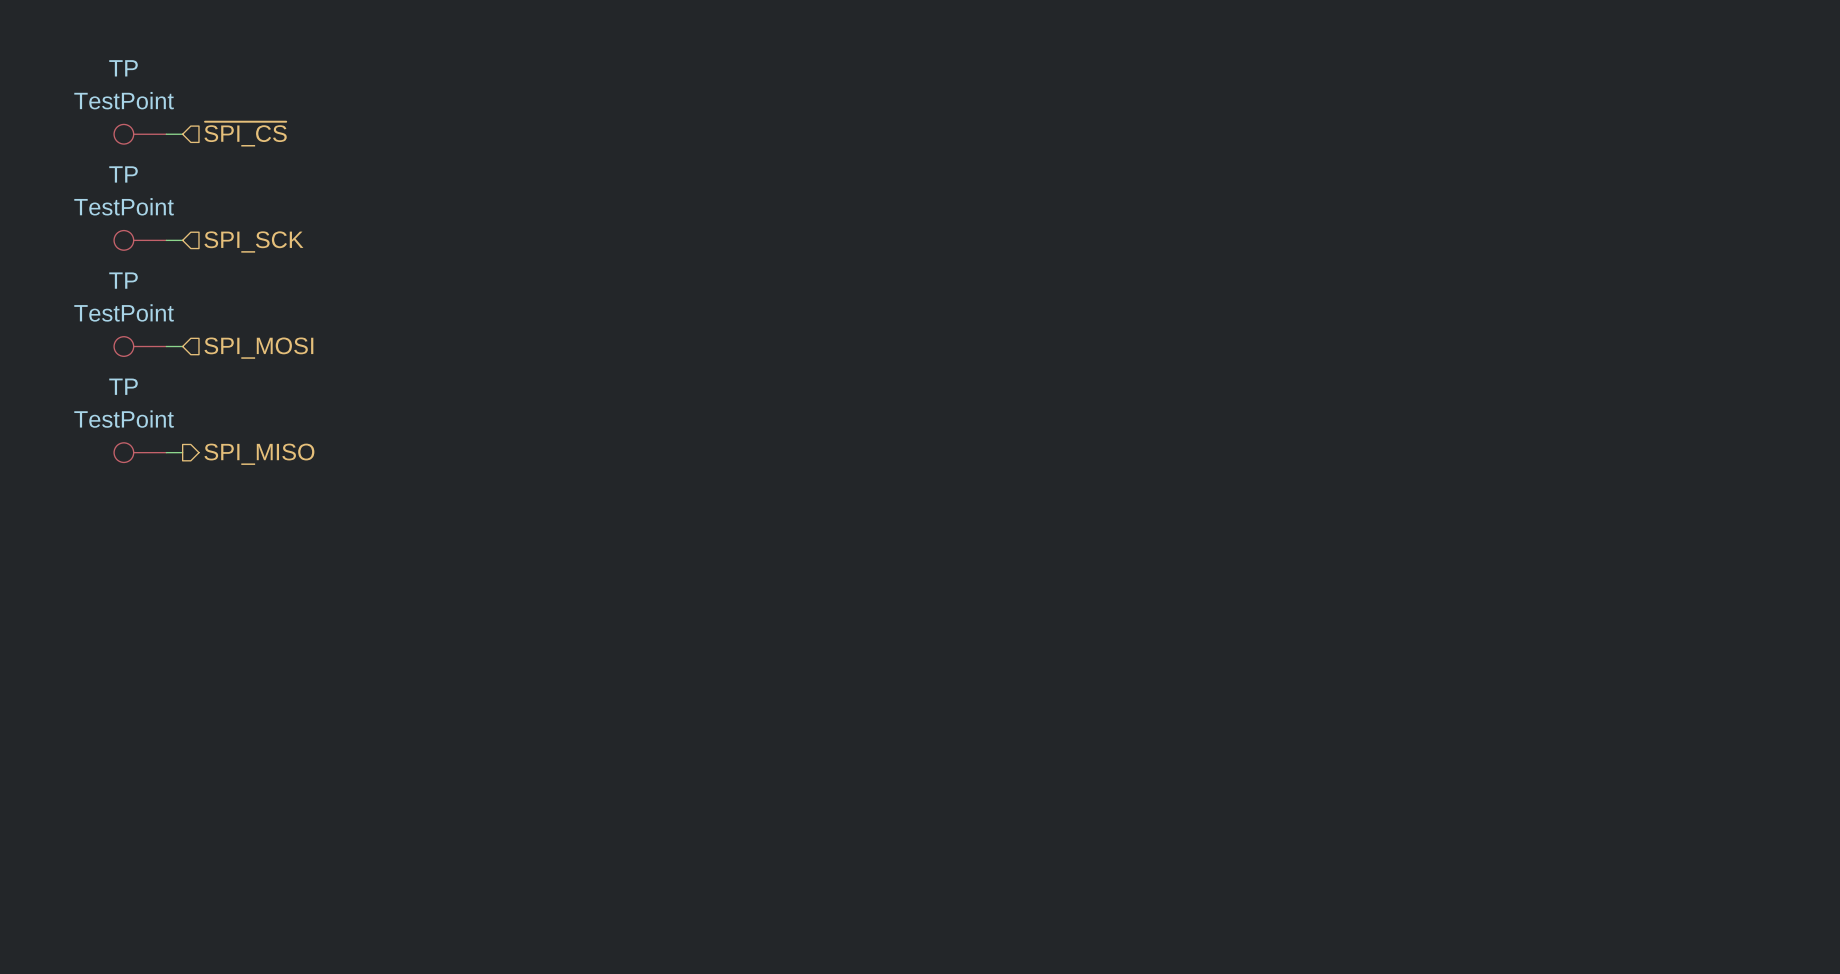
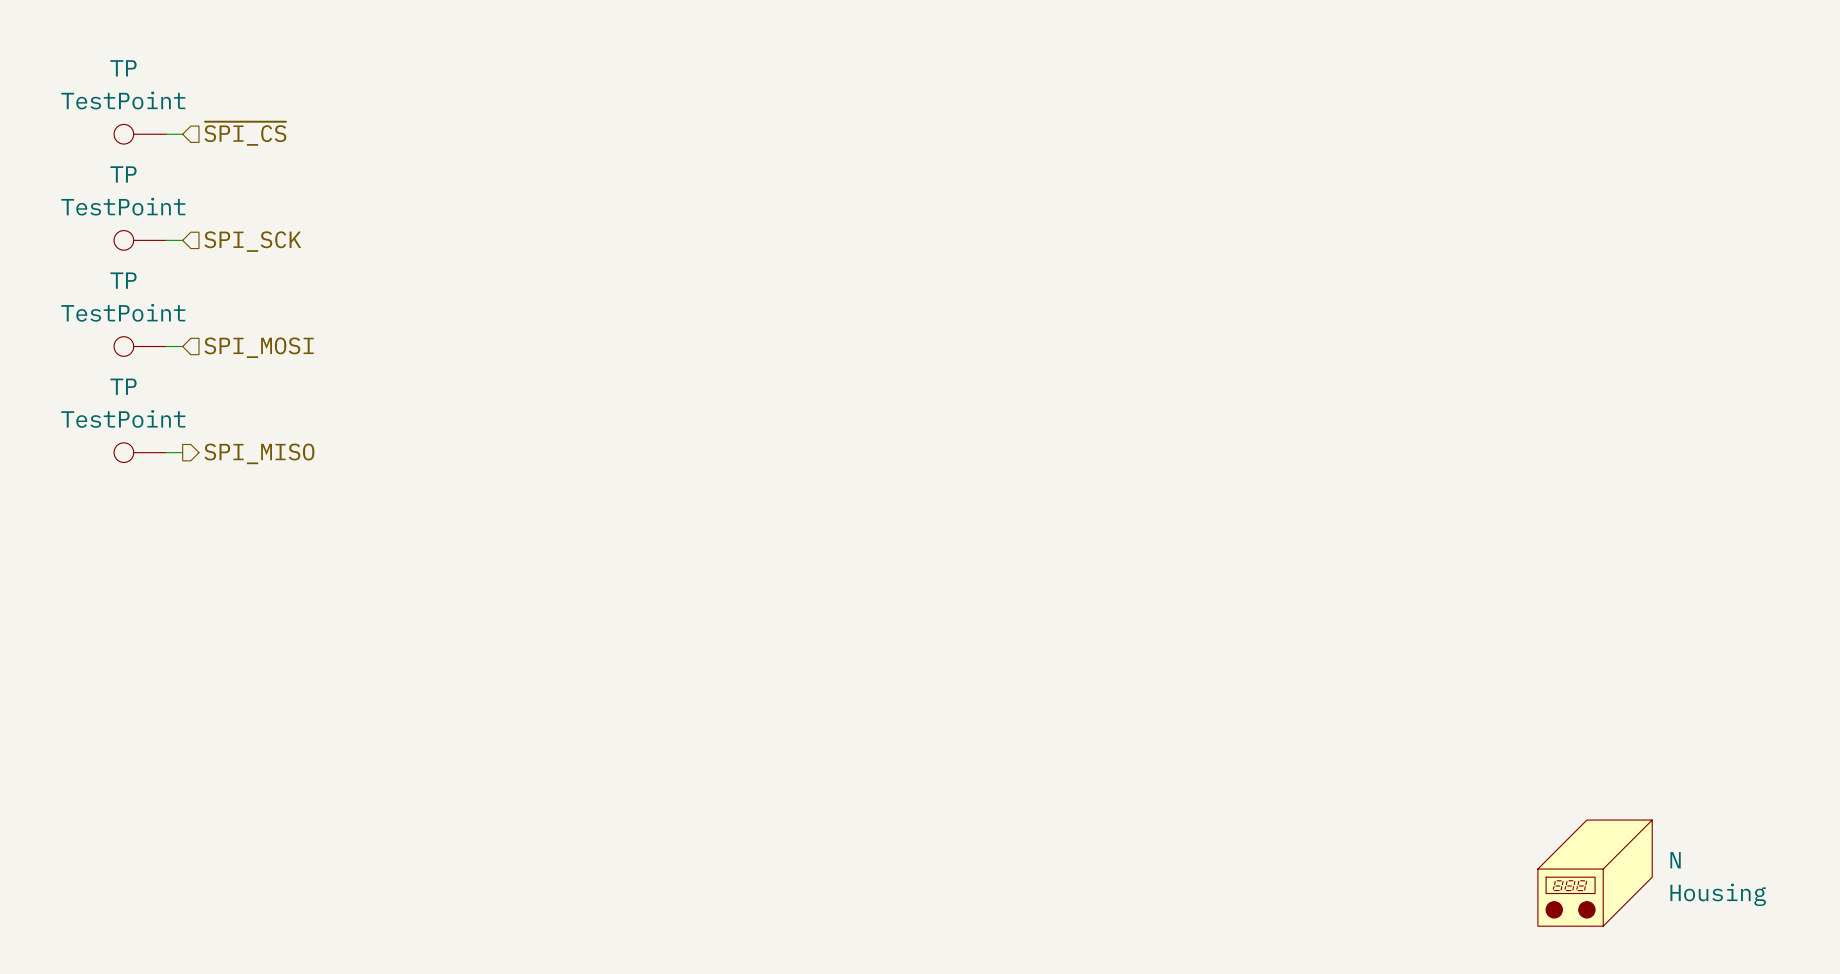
N: none -> Housing (1595, 873)

